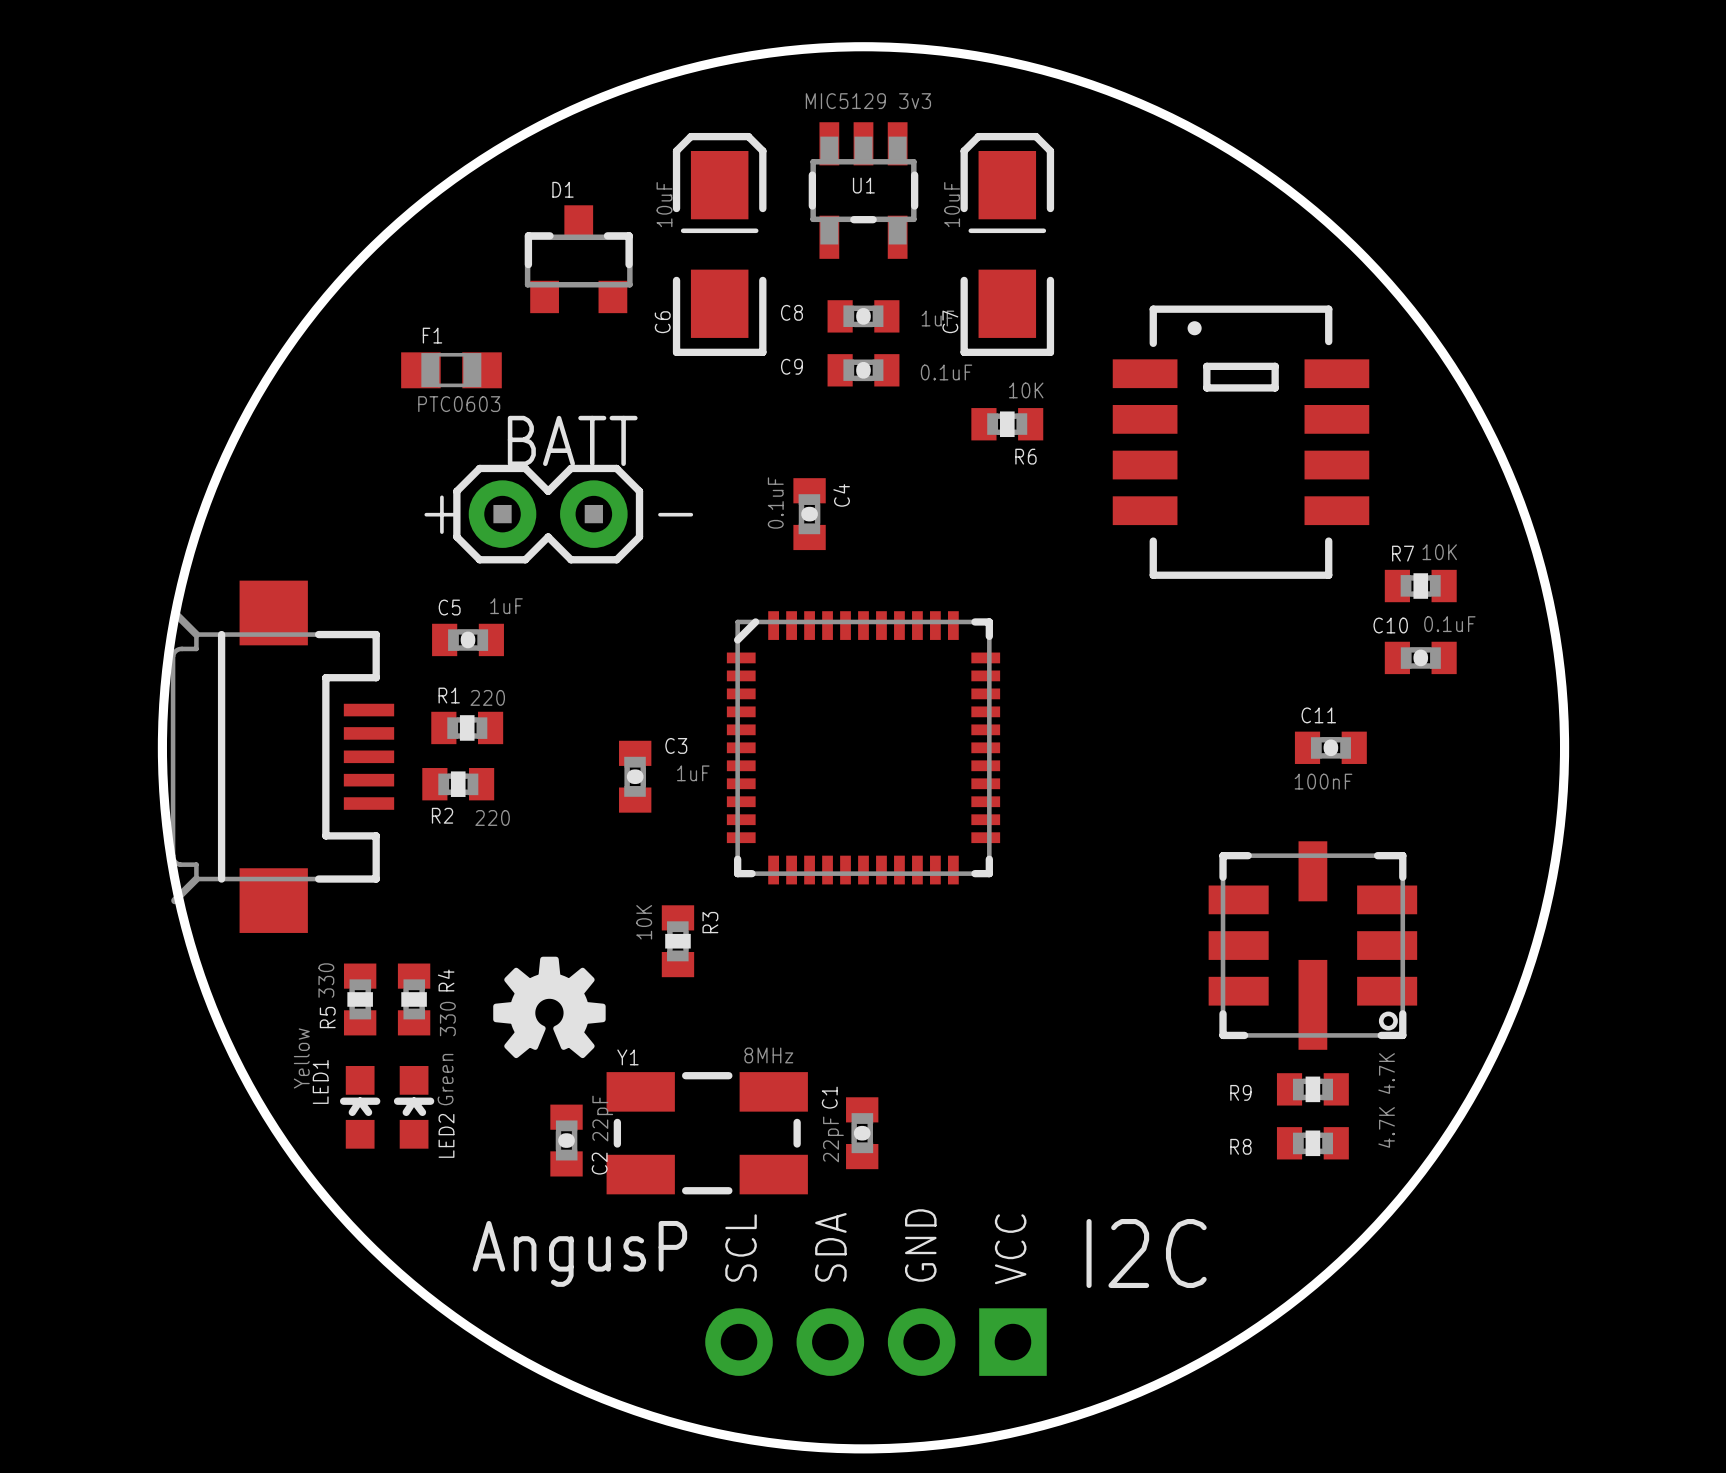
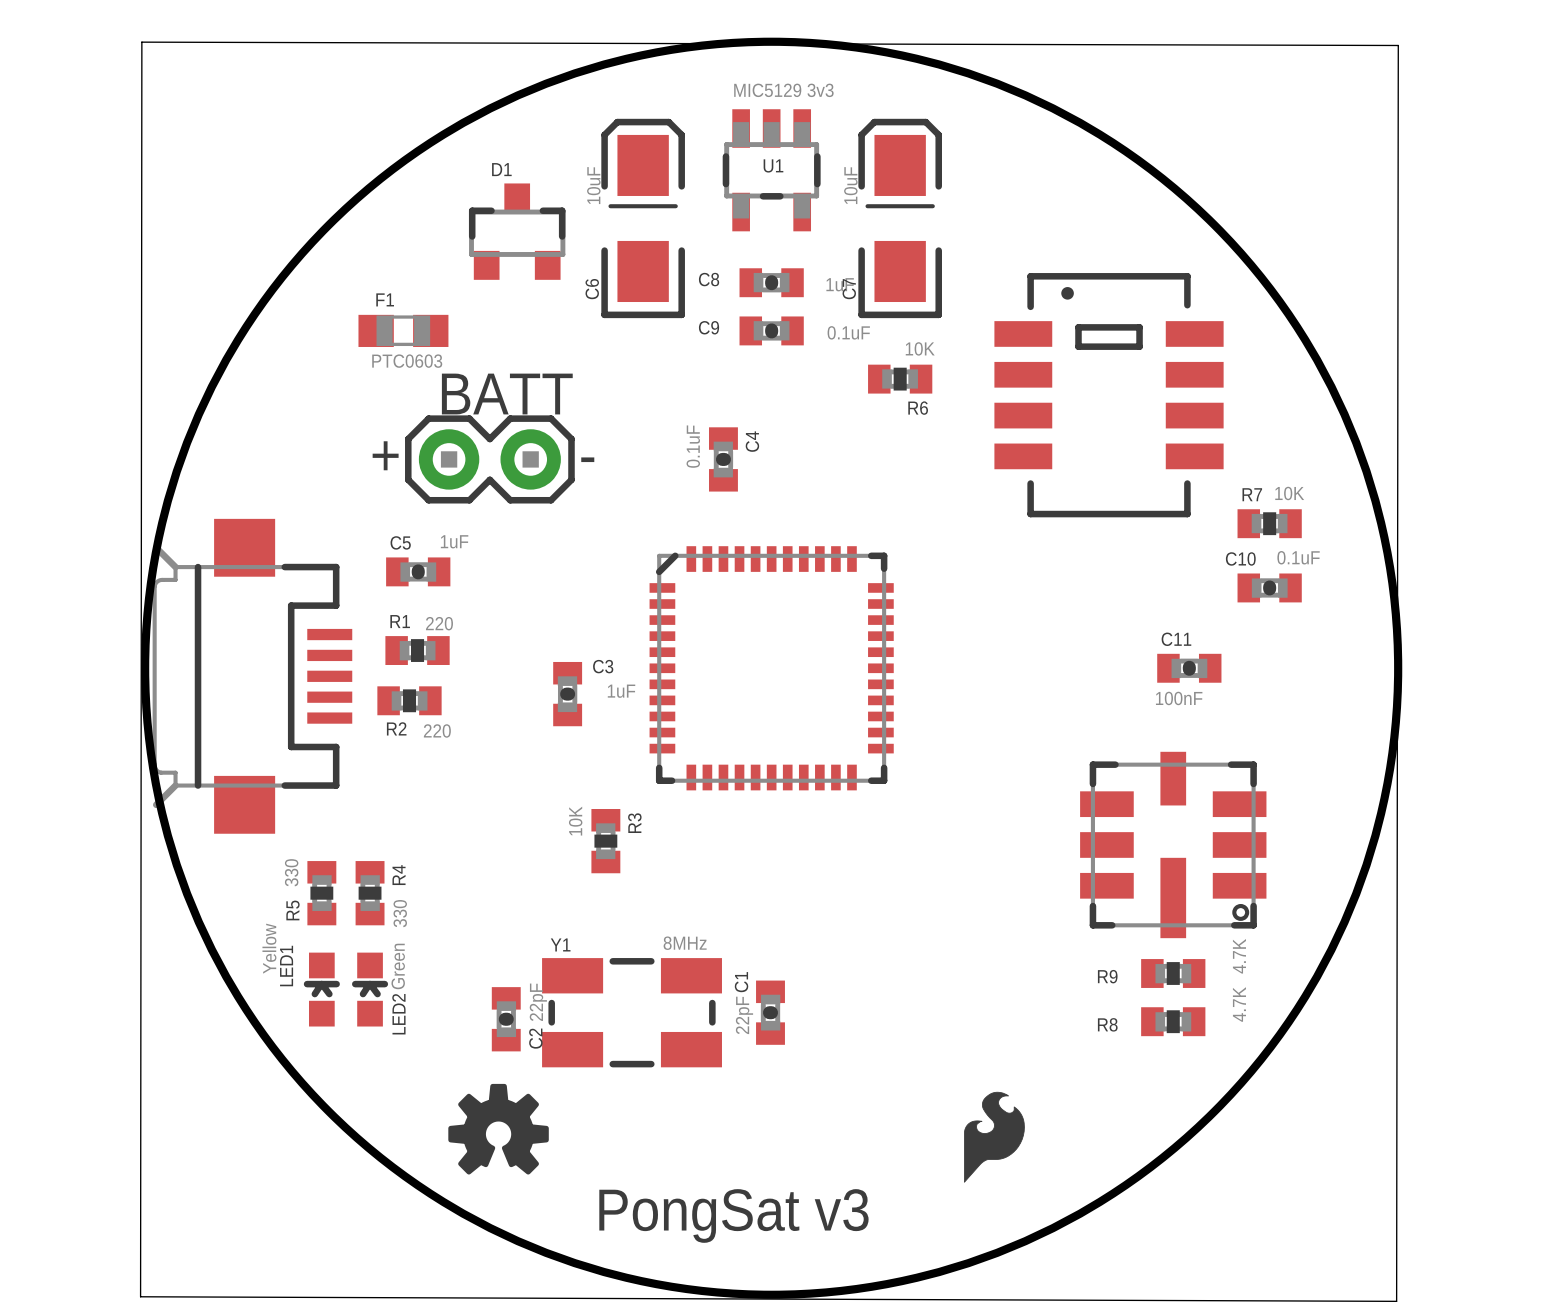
board edge: none -> (141, 42) (1398, 45) (1396, 1301) (140, 1296) (141, 42)
drawing position: (549, 1007) -> (498, 1129)
drawing: none -> [964, 1091, 1025, 1183]
text: GND (920, 1245) -> none
text: SCL (741, 1247) -> none
text: SDA (830, 1247) -> none
text: VCC (1010, 1249) -> none
text: AngusP (579, 1253) -> none
text: I2C (1146, 1253) -> none
part: (875, 1342) -> none
text: none -> PongSat v3 (733, 1215)

